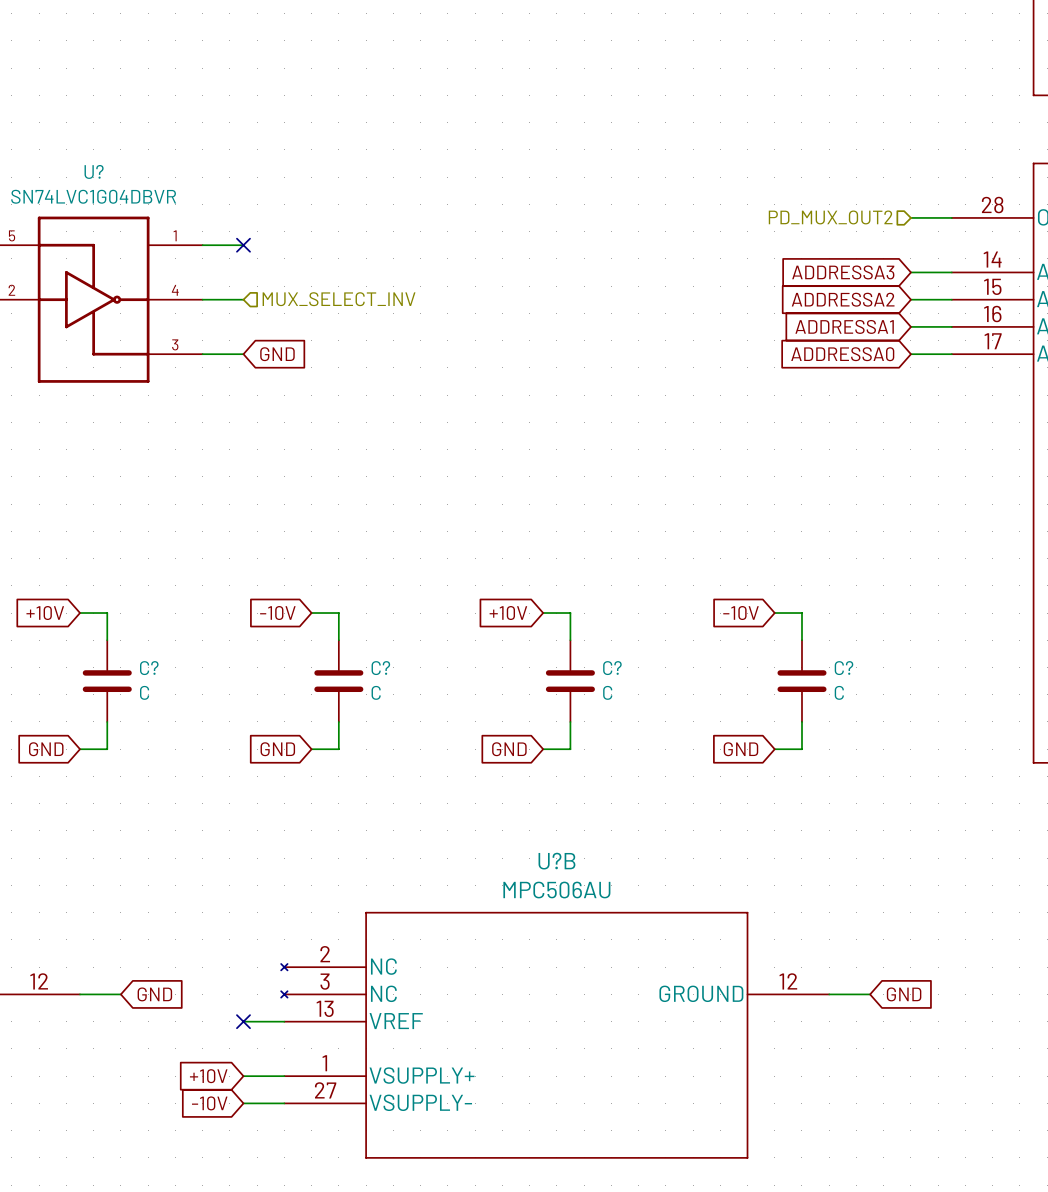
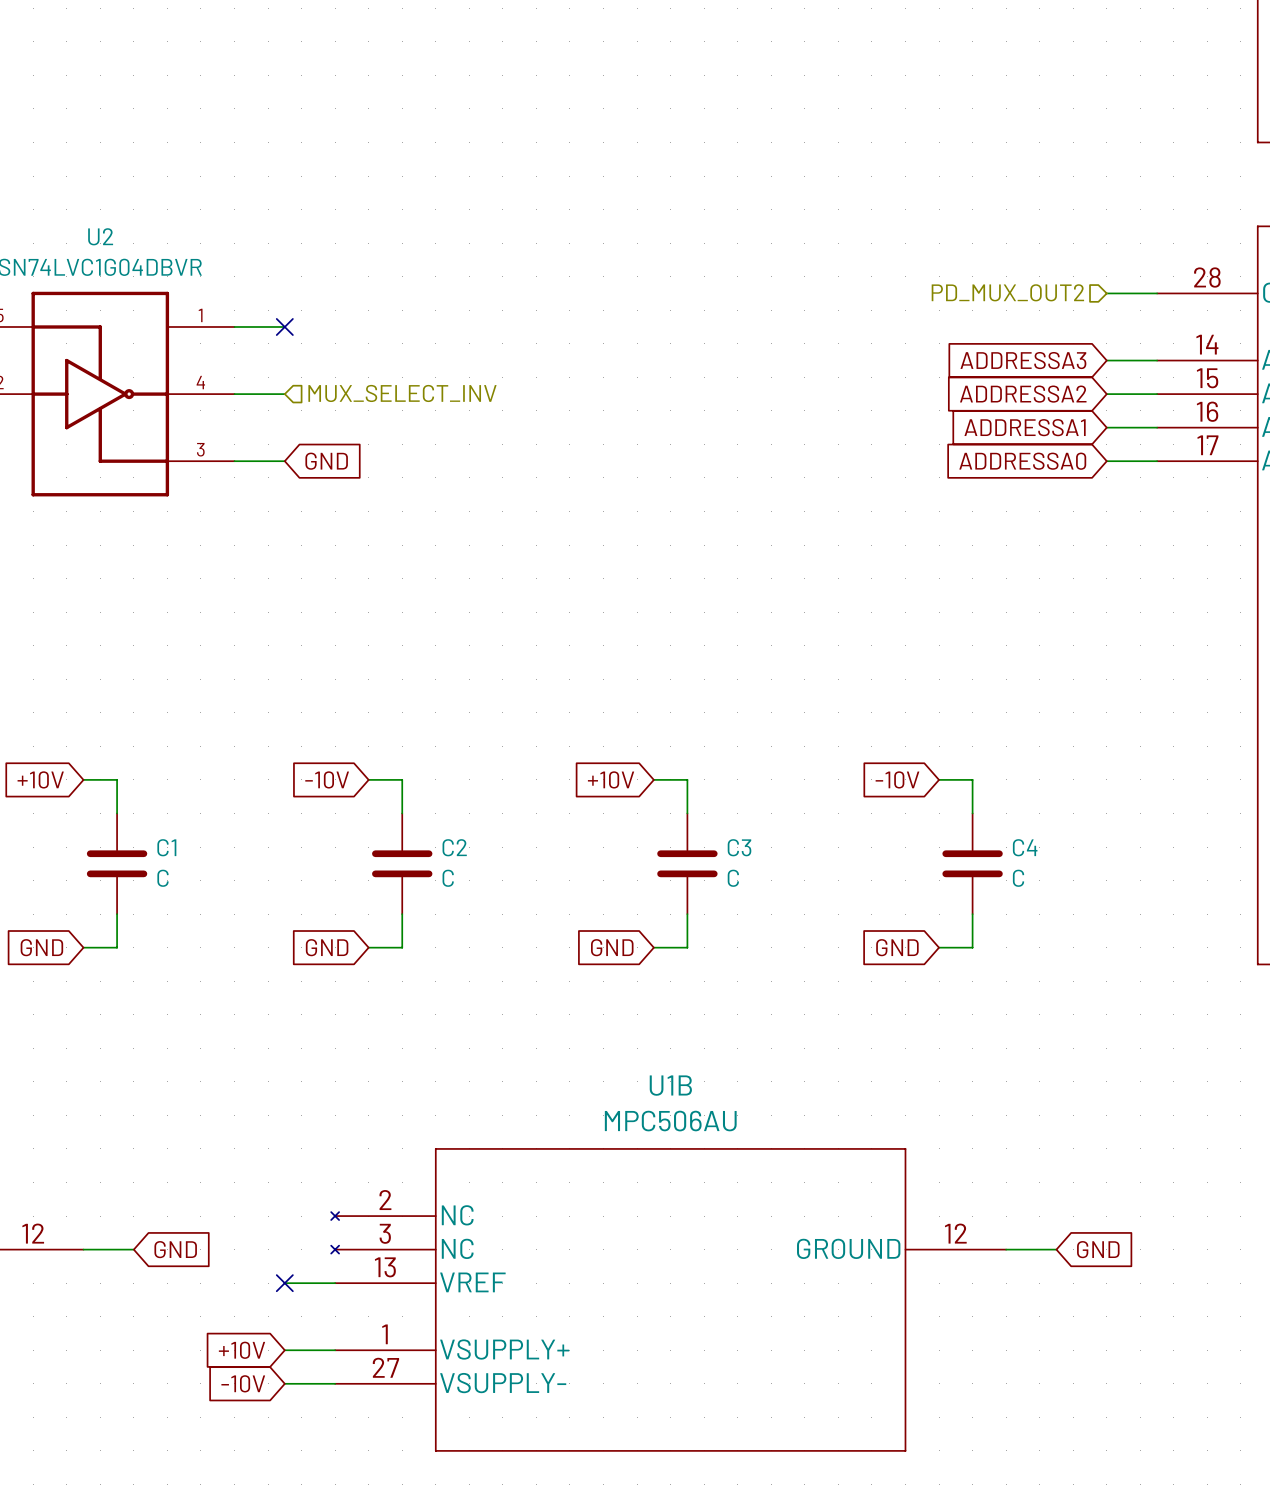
U? name: U? (94, 171) -> U2 (100, 236)
C? name: C? (149, 668) -> C1 (166, 847)
C? name: C? (380, 668) -> C2 (454, 847)
C? name: C? (612, 668) -> C3 (739, 847)
C? name: C? (844, 668) -> C4 (1025, 847)
U?B name: U?B (556, 861) -> U1B (670, 1085)

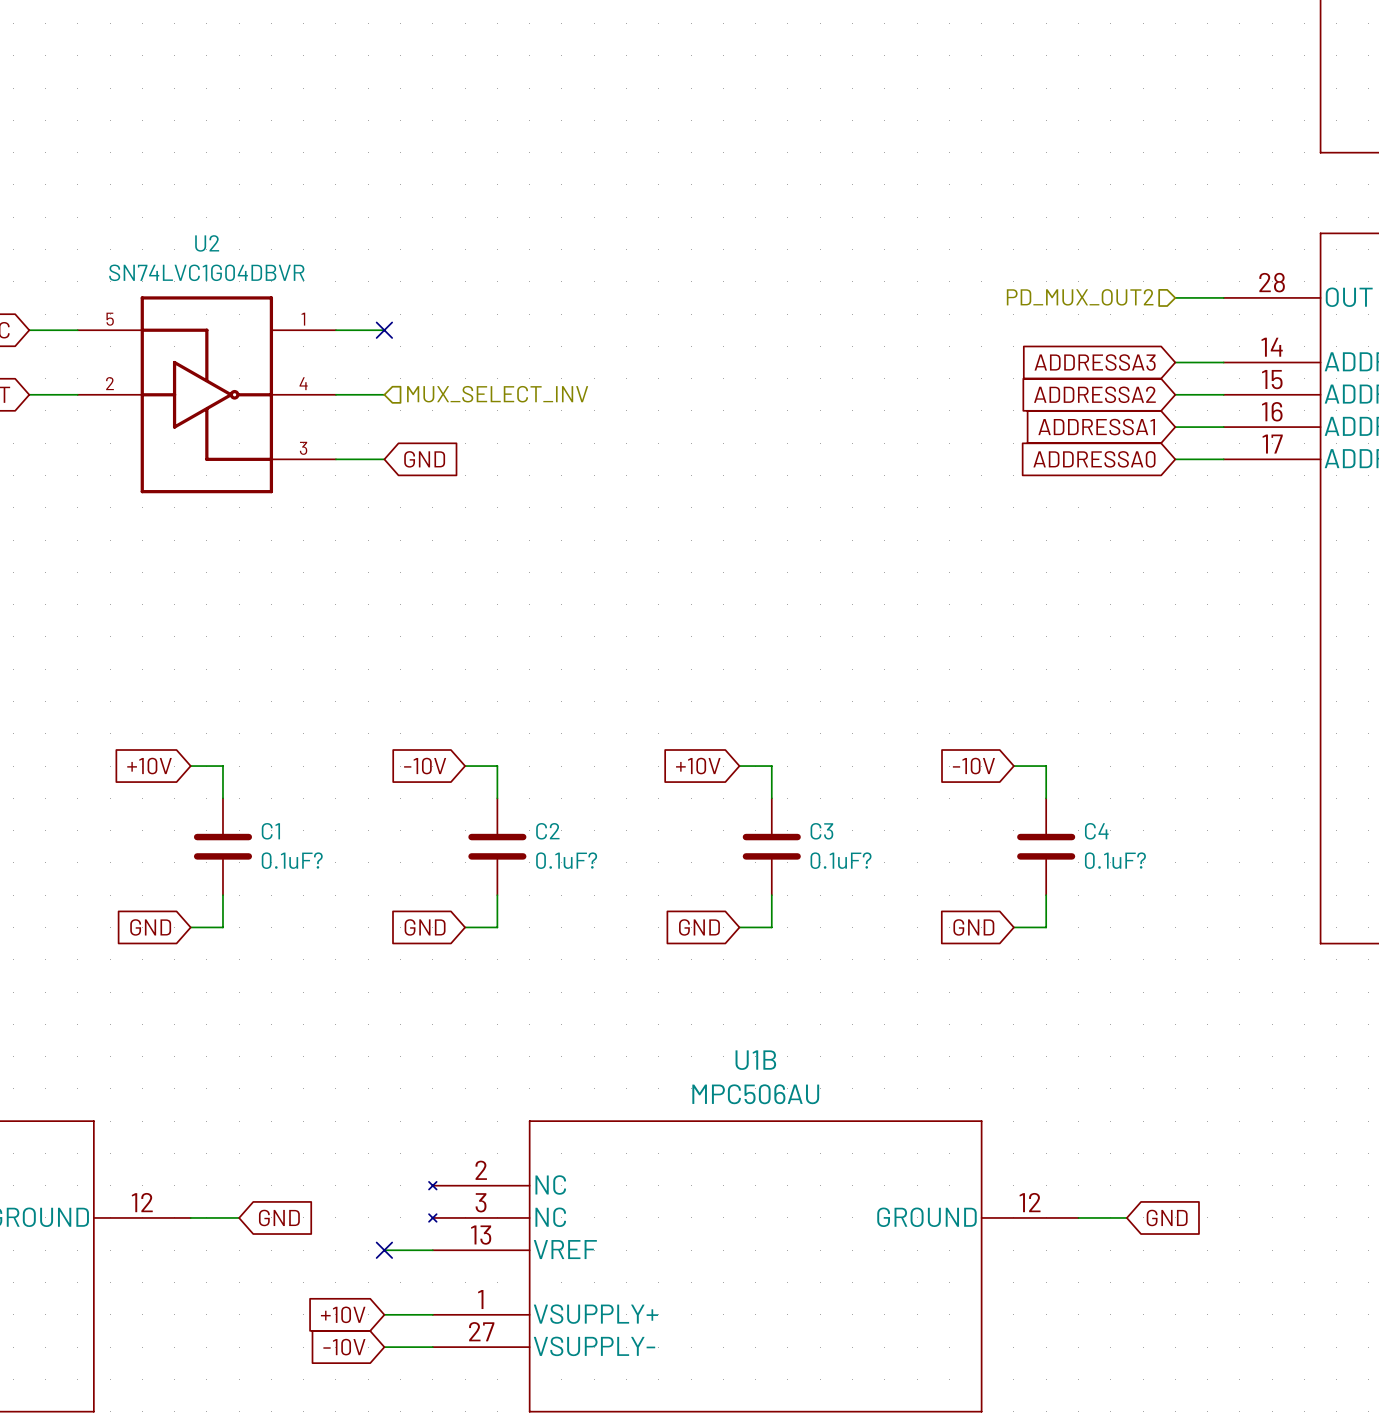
C1 value: C (163, 878) -> 0.1uF? (292, 860)
C2 value: C (448, 878) -> 0.1uF? (566, 860)
C3 value: C (733, 878) -> 0.1uF? (841, 860)
C4 value: C (1018, 878) -> 0.1uF? (1115, 860)

